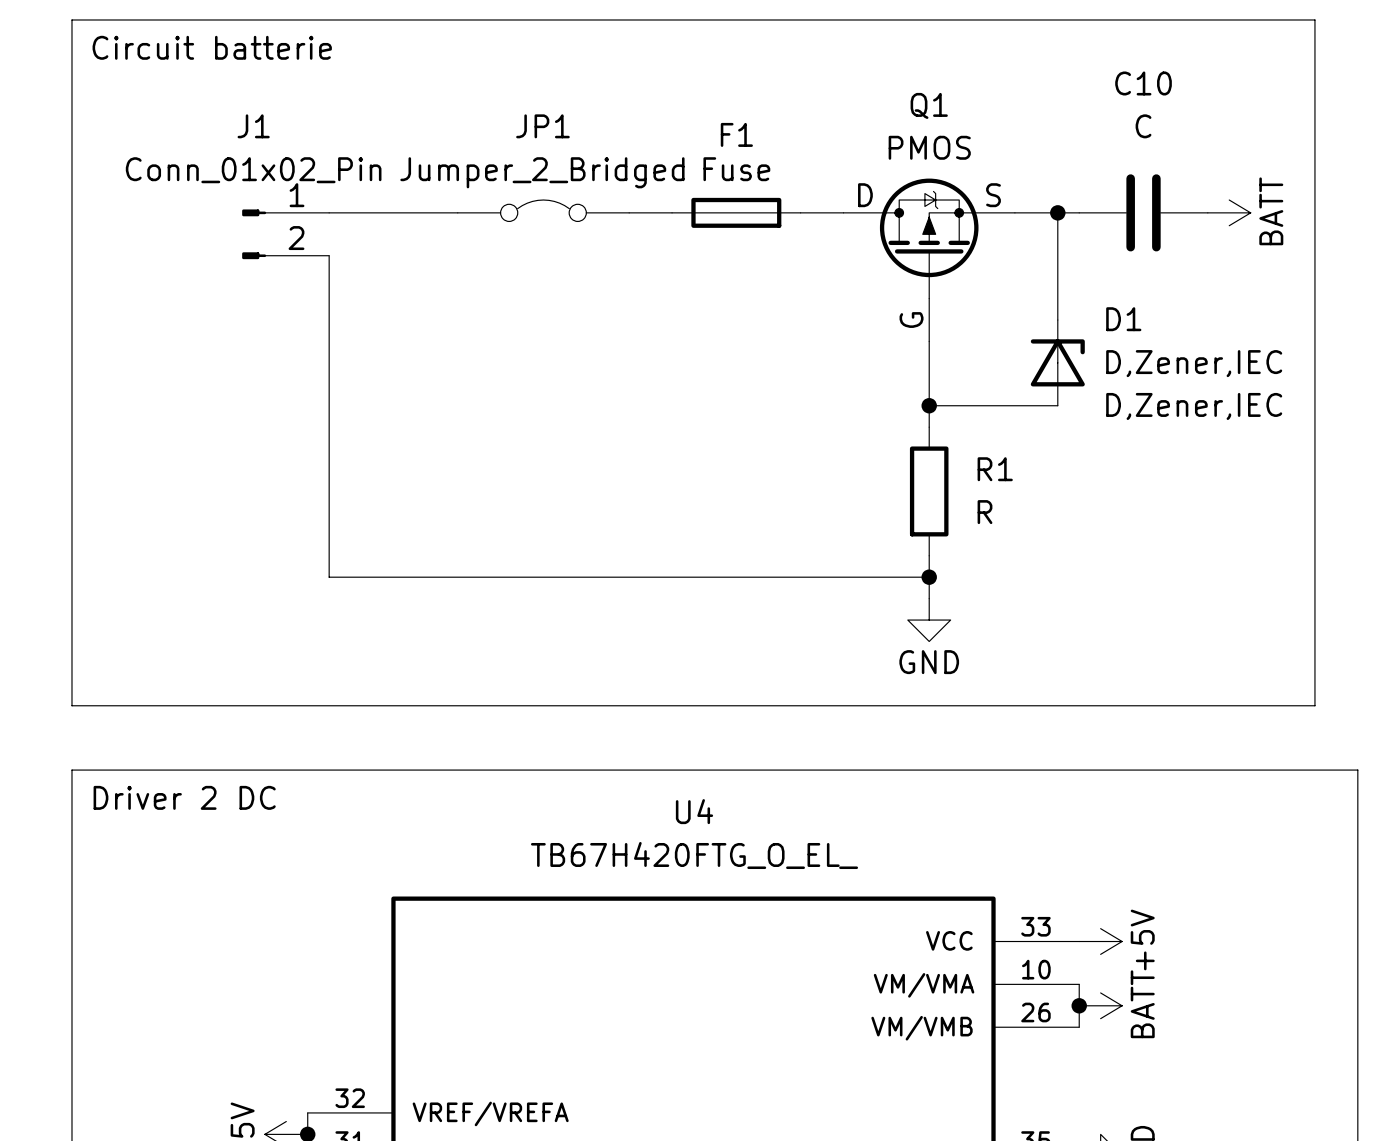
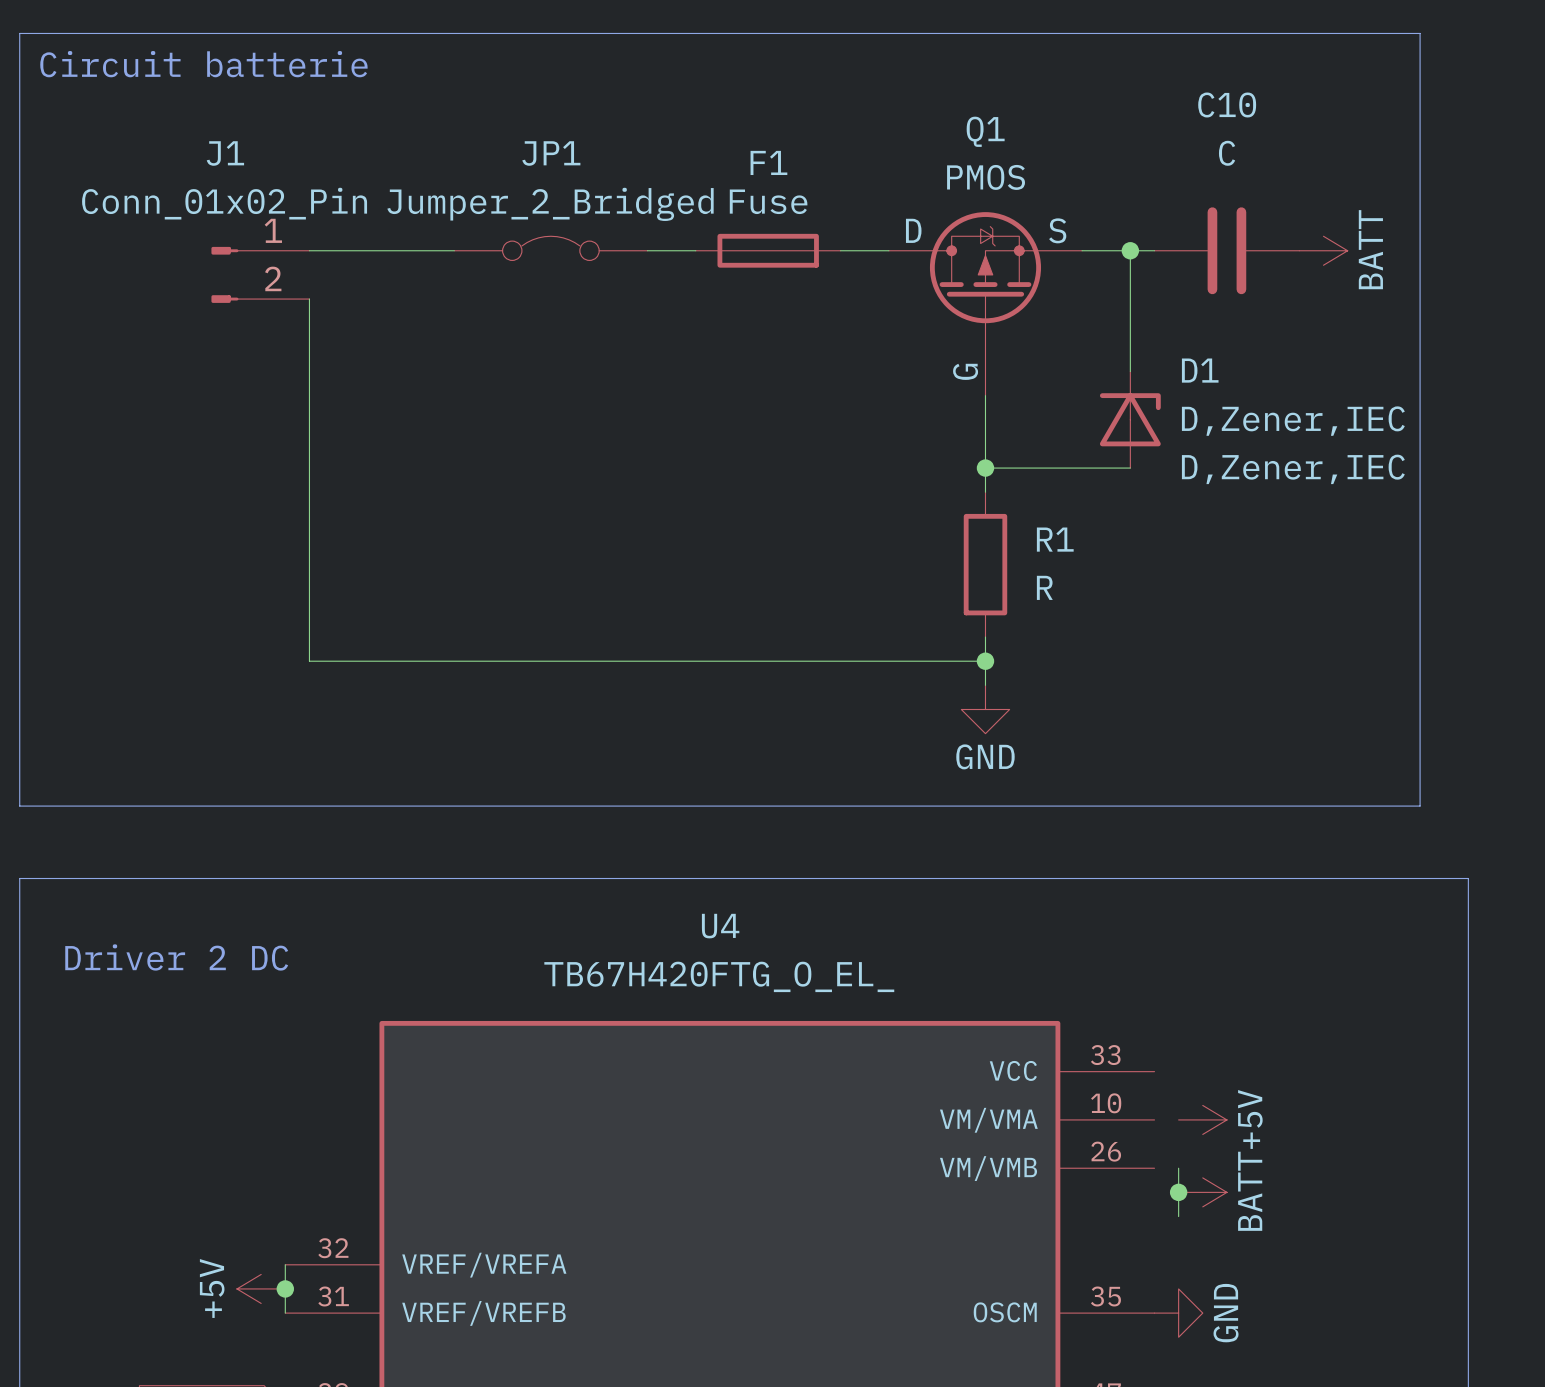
text position: Driver 2 DC (184, 797) -> Driver 2 DC (176, 957)
power symbol position: +5V (1100, 941) -> +5V (1202, 1119)
wire: (1079, 984) (1079, 1027) -> (1178, 1168) (1178, 1216)
junction position: (1079, 1005) -> (1178, 1192)
power symbol position: BATT (1100, 1005) -> BATT (1202, 1192)

